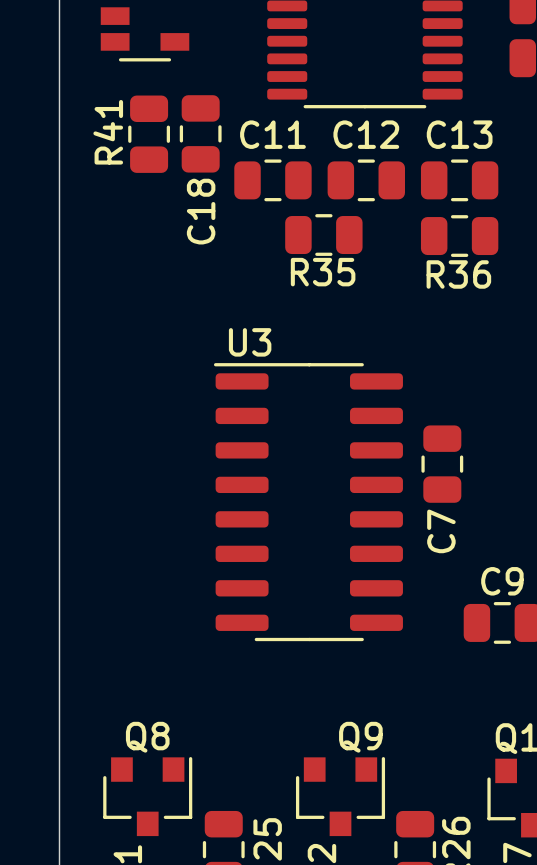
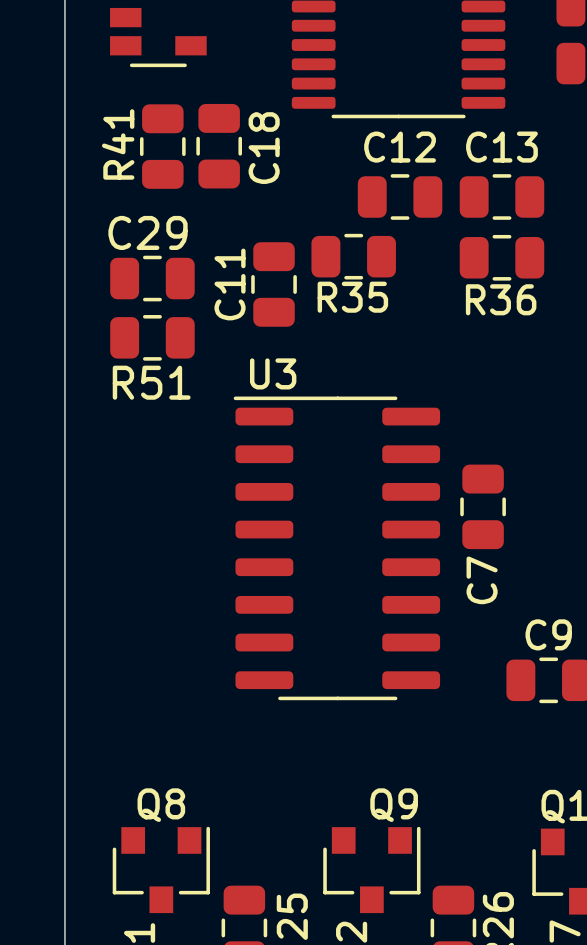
C11 name position: C11 (272, 134) -> C11 (230, 284)
C11 rotation: 0° (272, 180) -> 90° clockwise (274, 284)
C11 position: (272, 180) -> (274, 284)
C18 name position: C18 (201, 211) -> C18 (264, 148)
C29: none -> (152, 278)
R51: none -> (152, 337)

